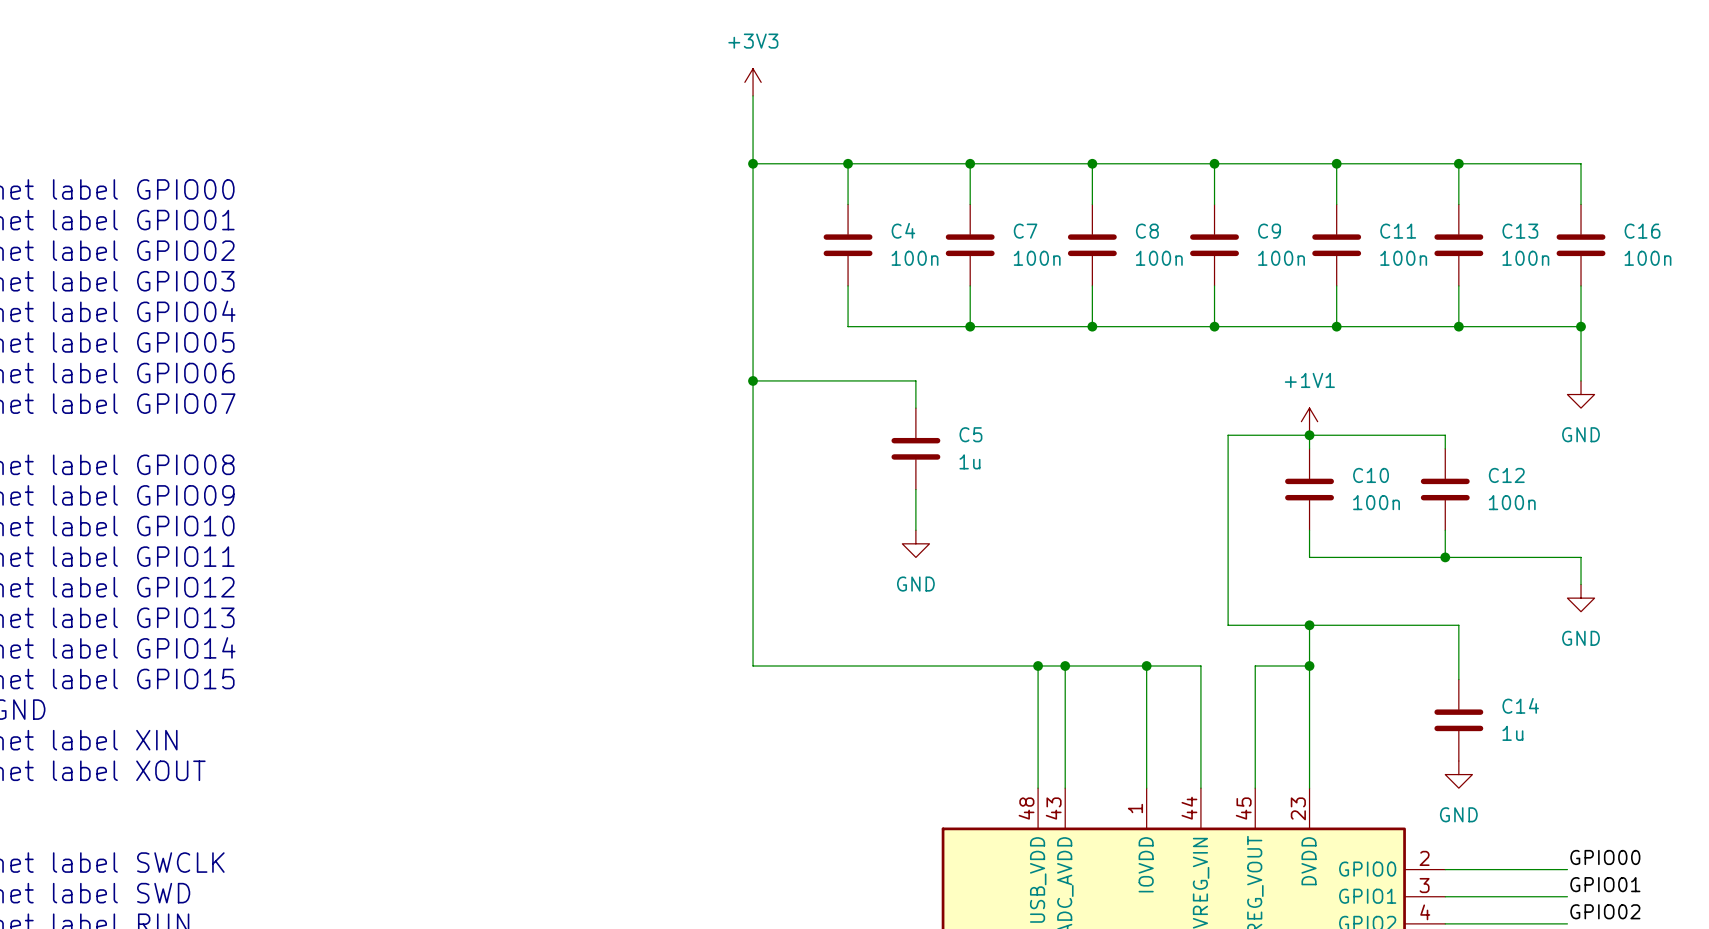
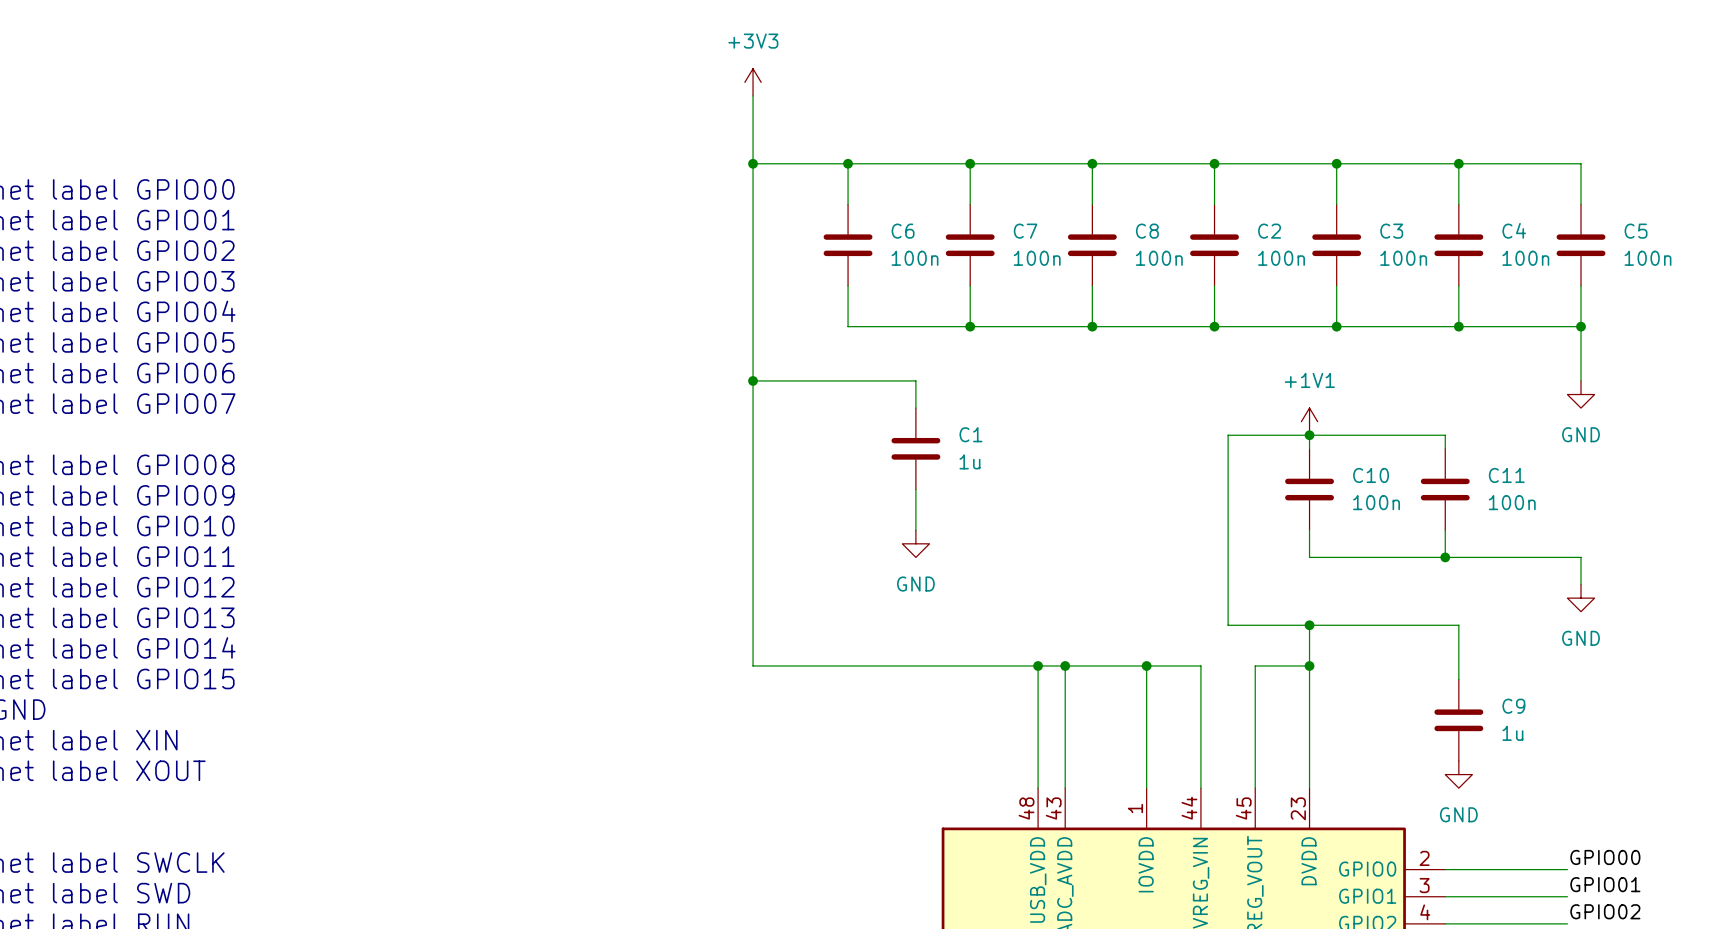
C4 name: C4 (903, 230) -> C6 (903, 231)
C9 name: C9 (1269, 231) -> C2 (1269, 231)
C11 name: C11 (1398, 231) -> C3 (1391, 231)
C13 name: C13 (1520, 231) -> C4 (1514, 230)
C16 name: C16 (1642, 231) -> C5 (1636, 231)
C5 name: C5 (970, 434) -> C1 (970, 434)
C12 name: C12 (1506, 475) -> C11 (1506, 475)
C14 name: C14 (1520, 705) -> C9 (1513, 706)

